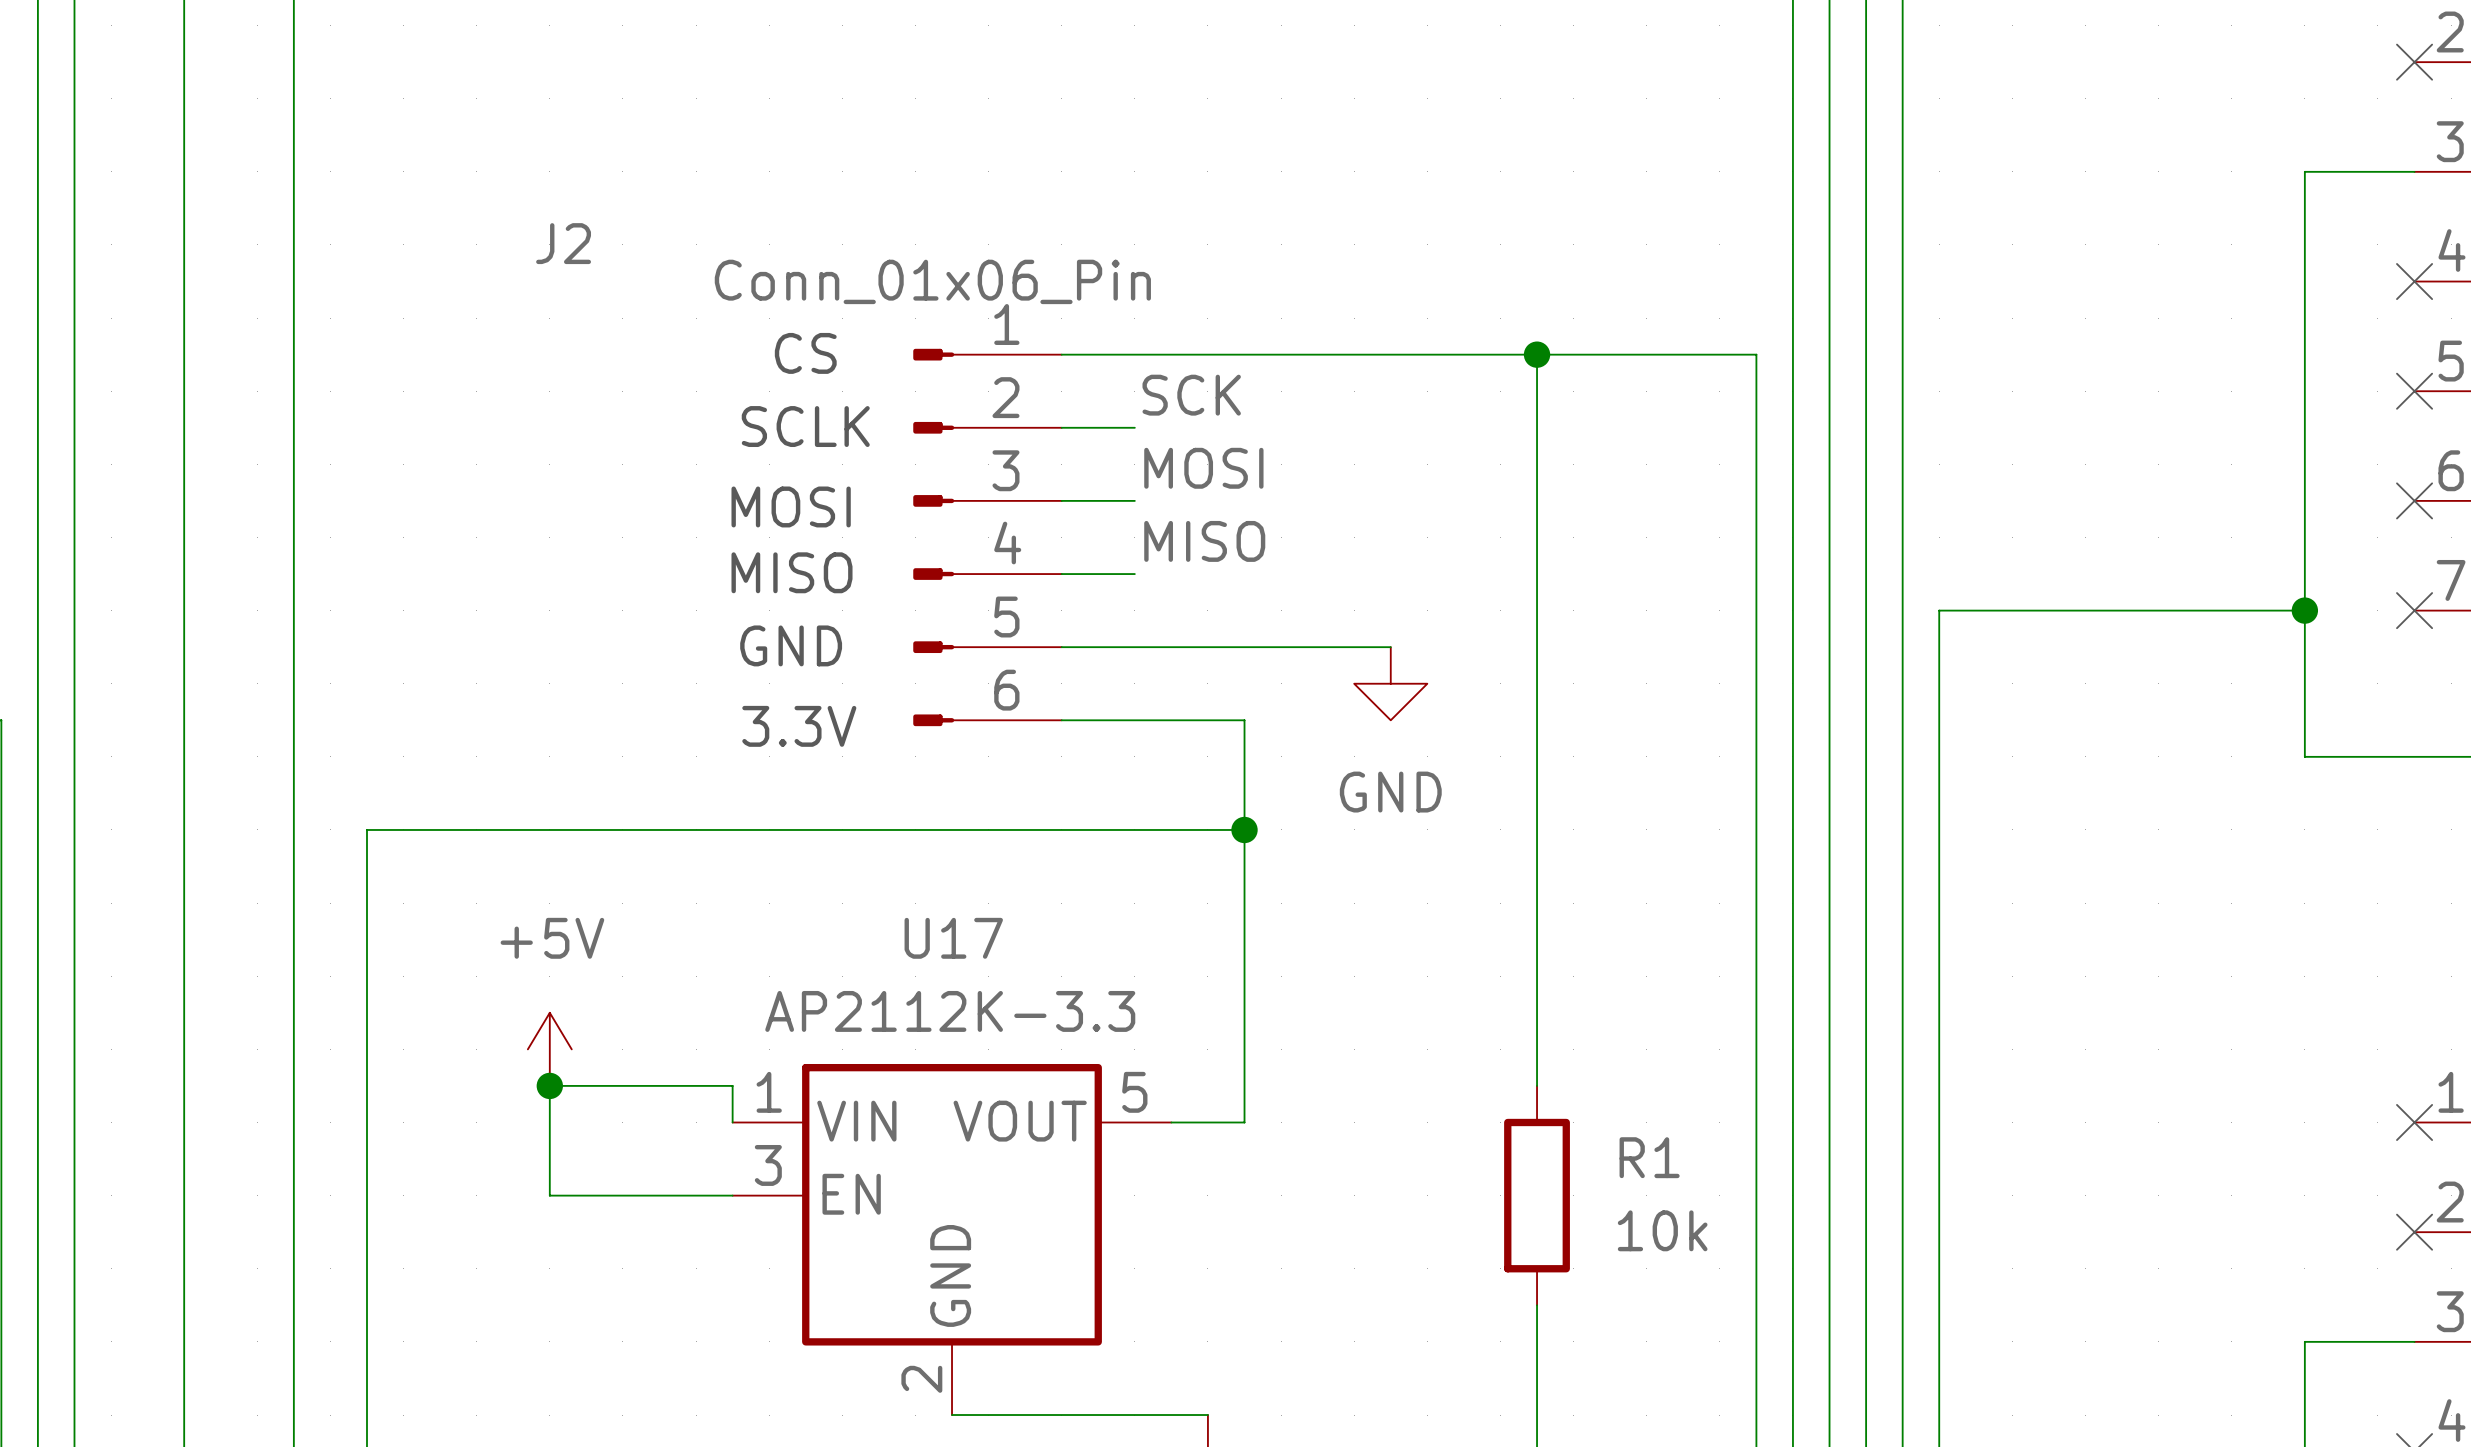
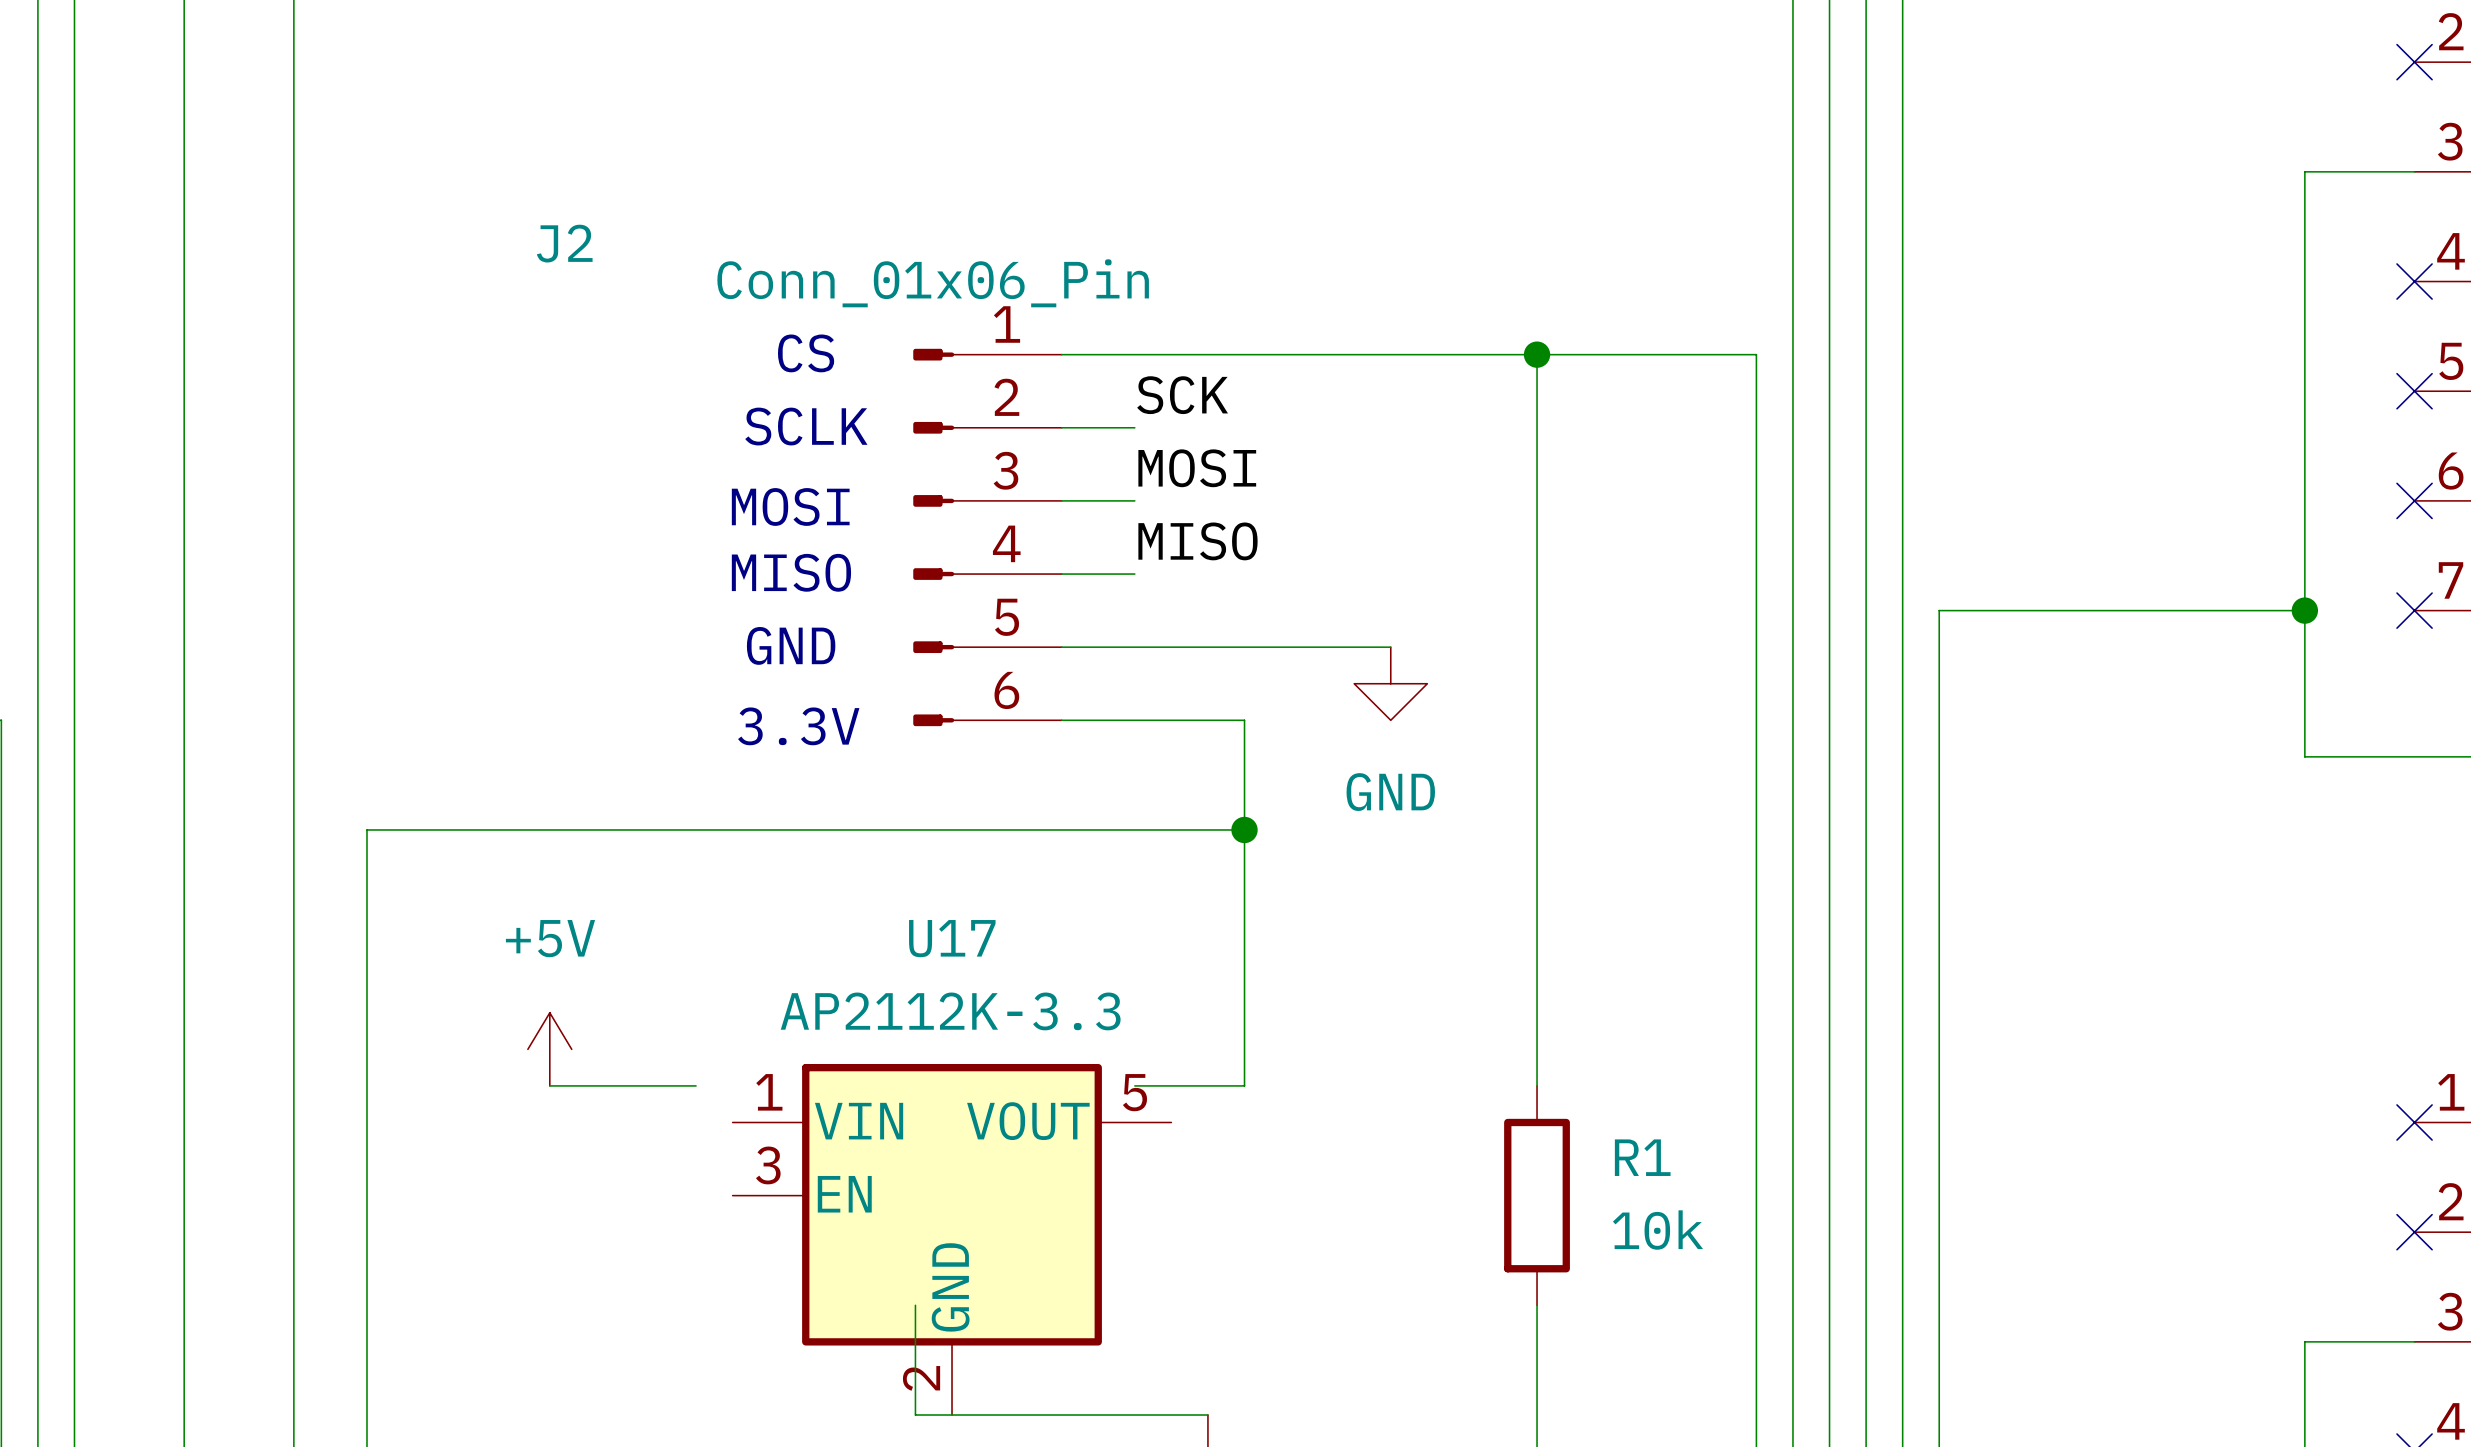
wire: (549, 1085) (549, 1195) (732, 1195) -> none
junction: (549, 1085) -> none
wire: (696, 1085) (732, 1085) (732, 1122) -> none
wire: (1244, 1085) (1244, 1122) (1171, 1122) -> (1244, 1085) (1134, 1085)
wire: none -> (915, 1305) (915, 1415) (952, 1415)

